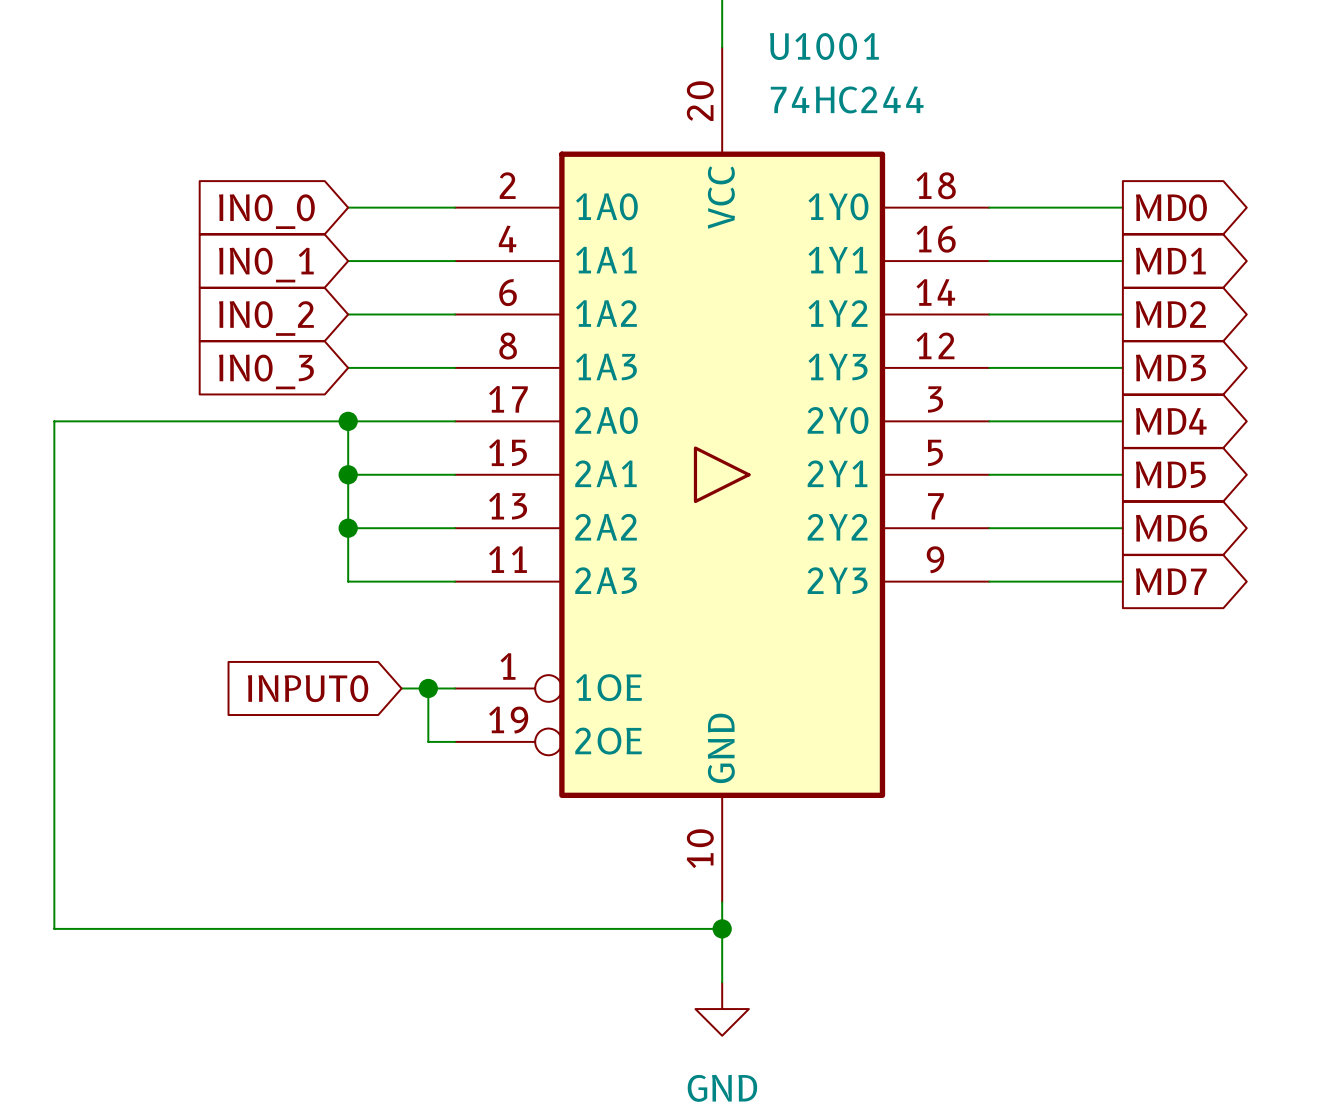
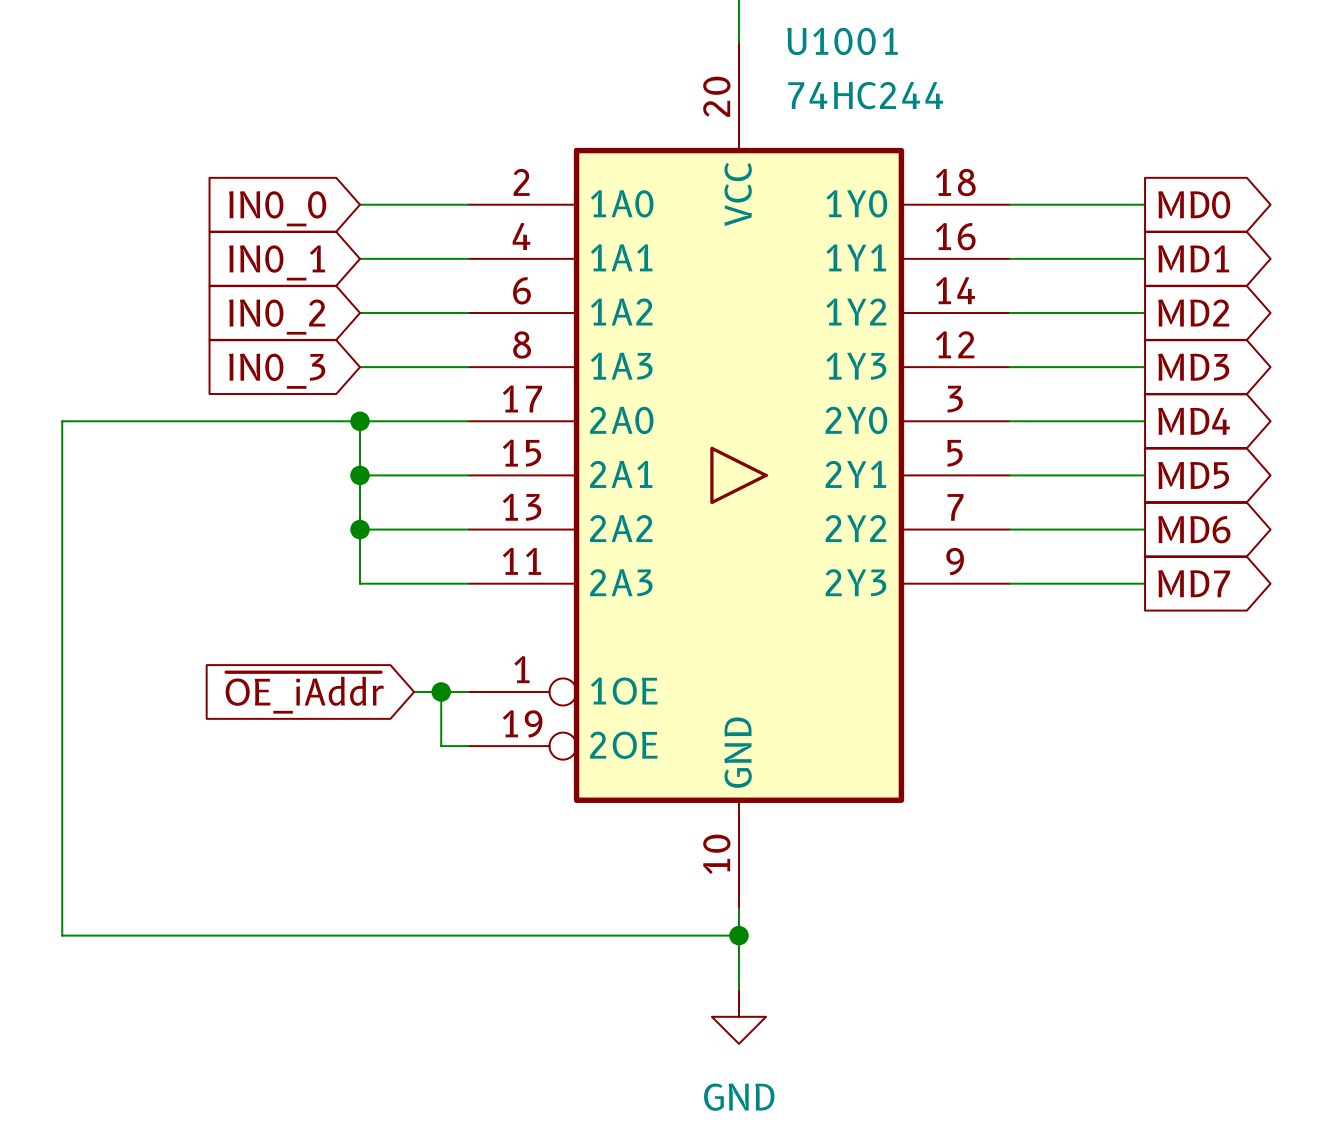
global label: INPUT0 (308, 688) -> ~{OE_iAddr} (304, 692)

